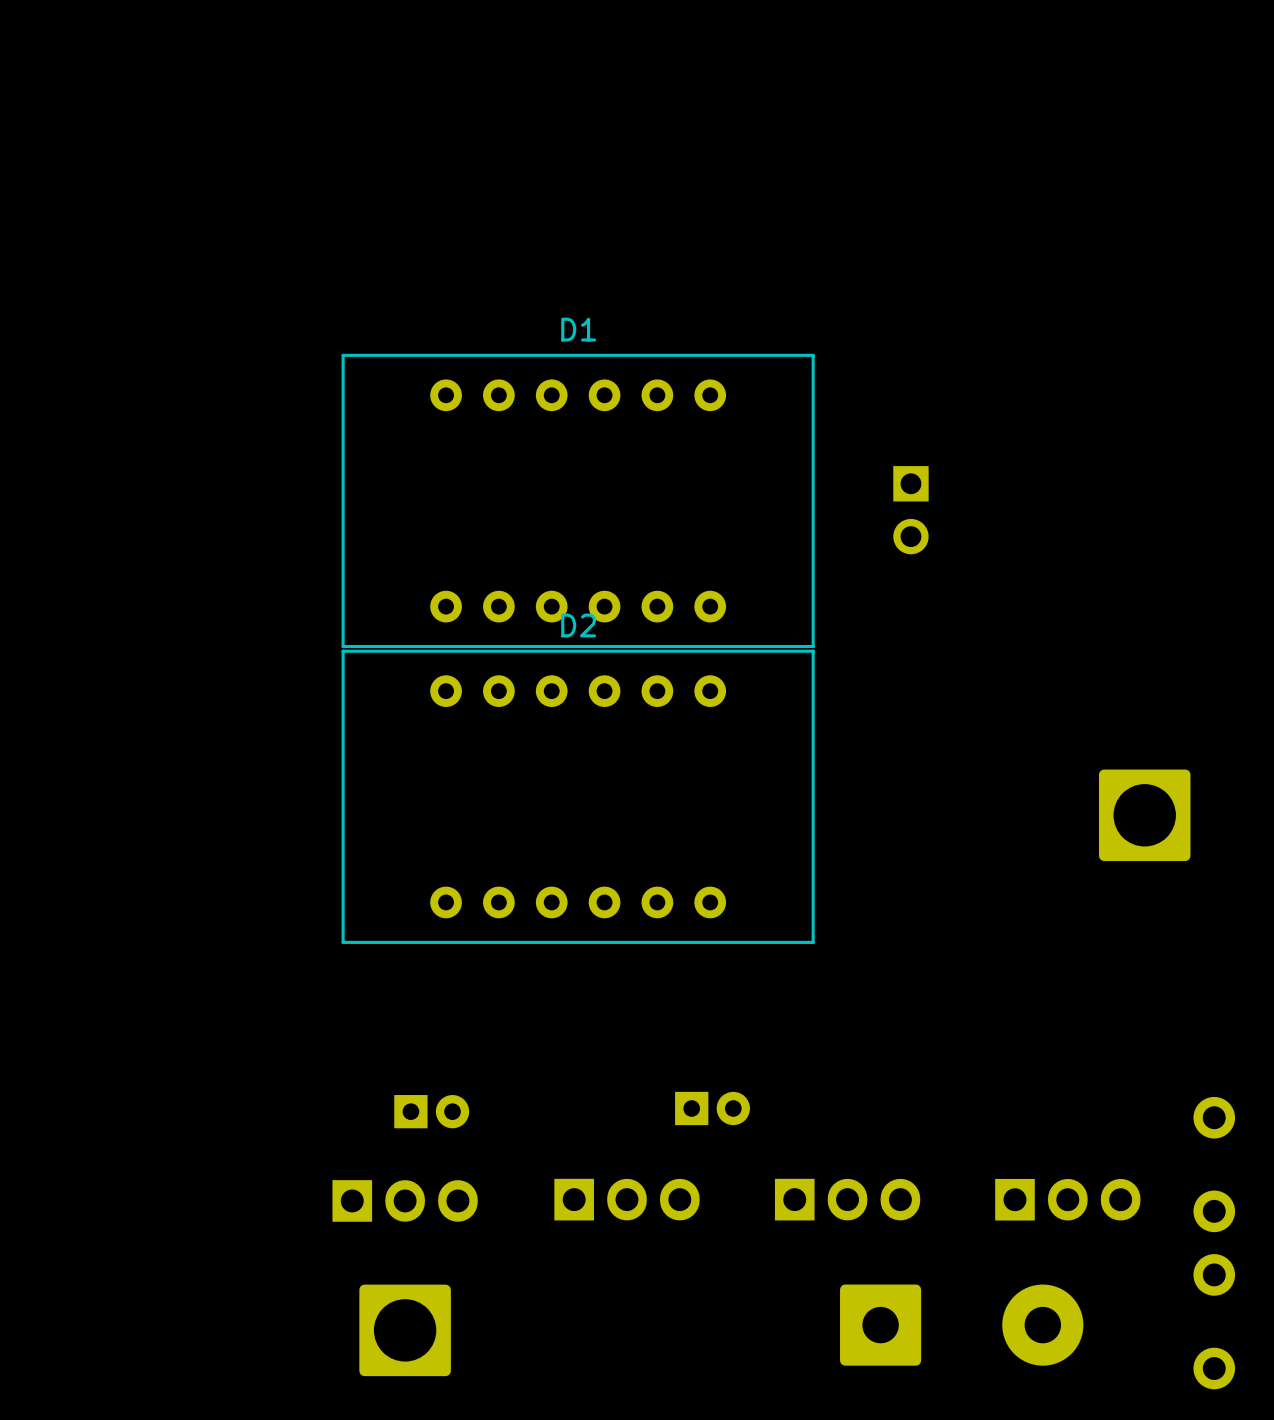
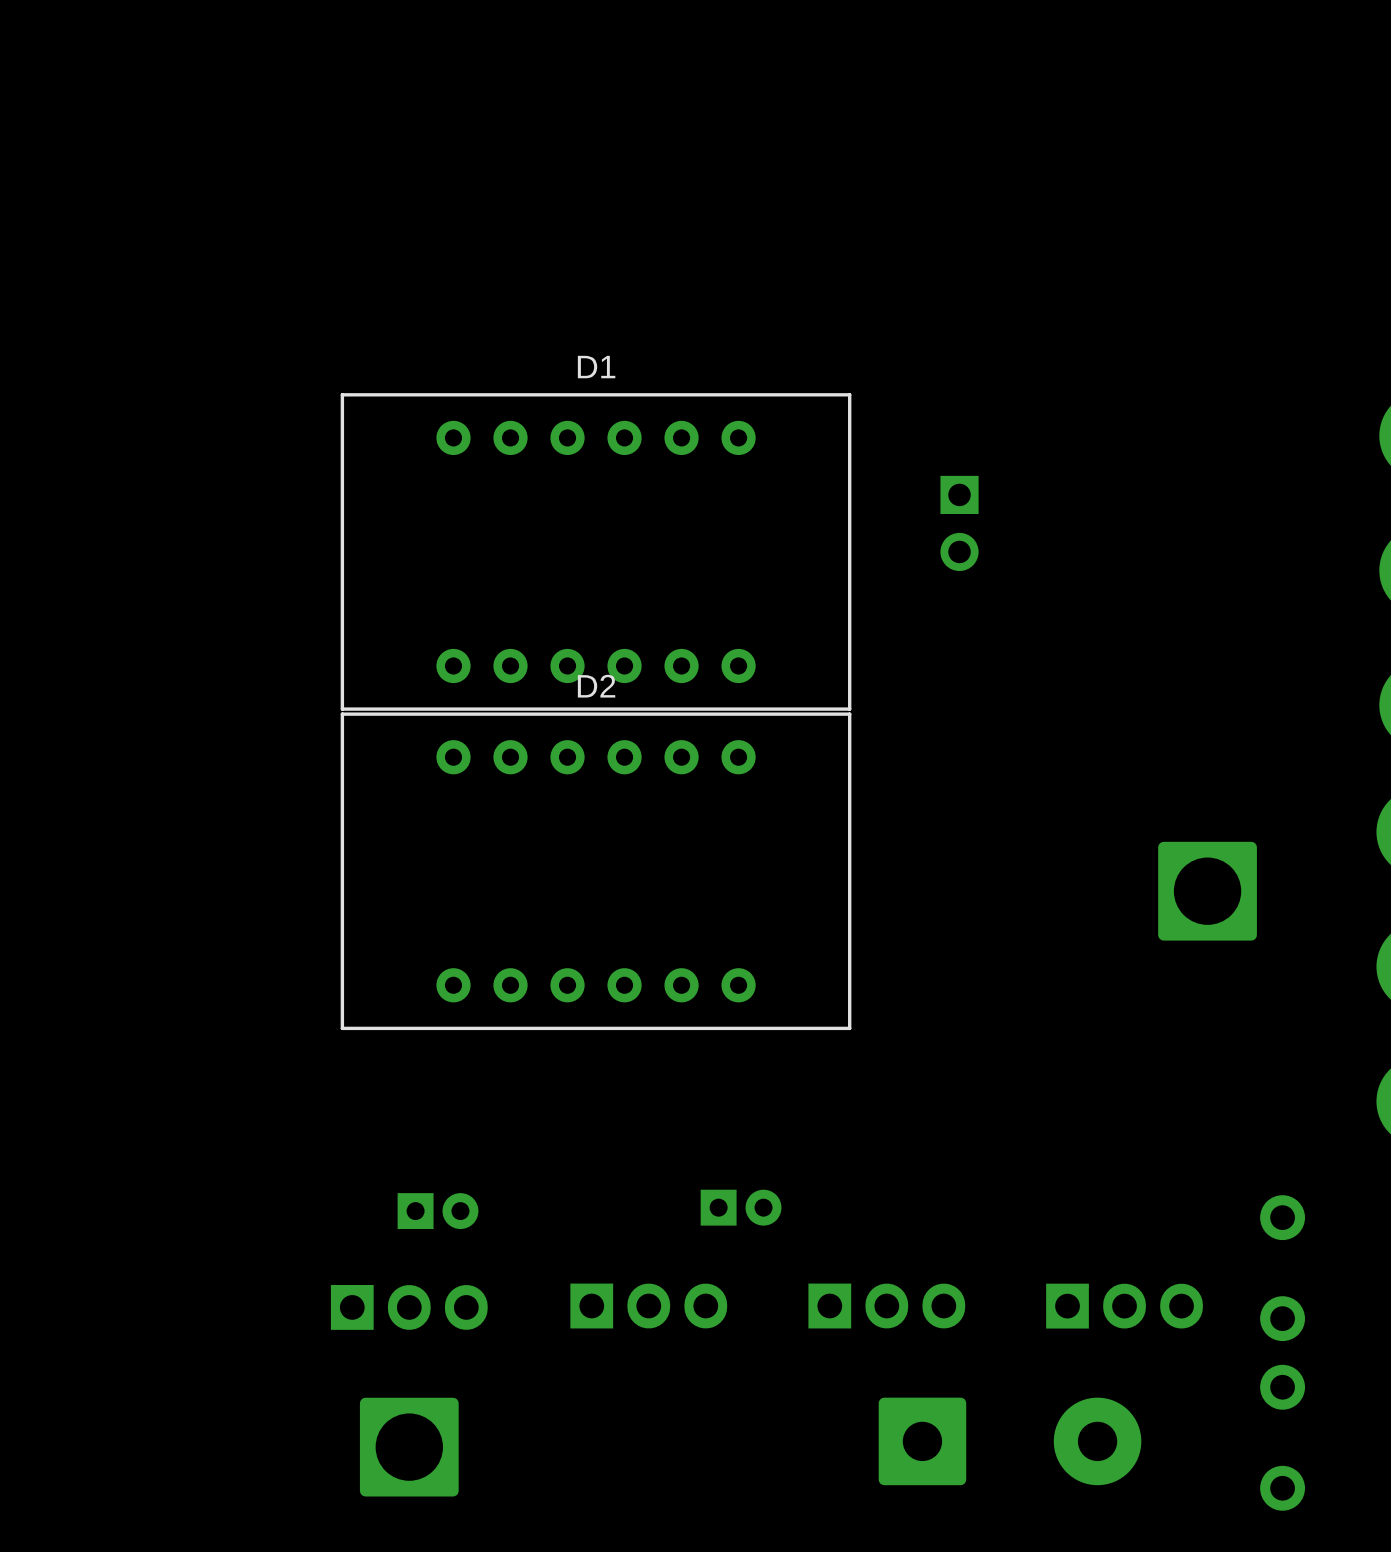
part position: (910, 510) -> (959, 523)

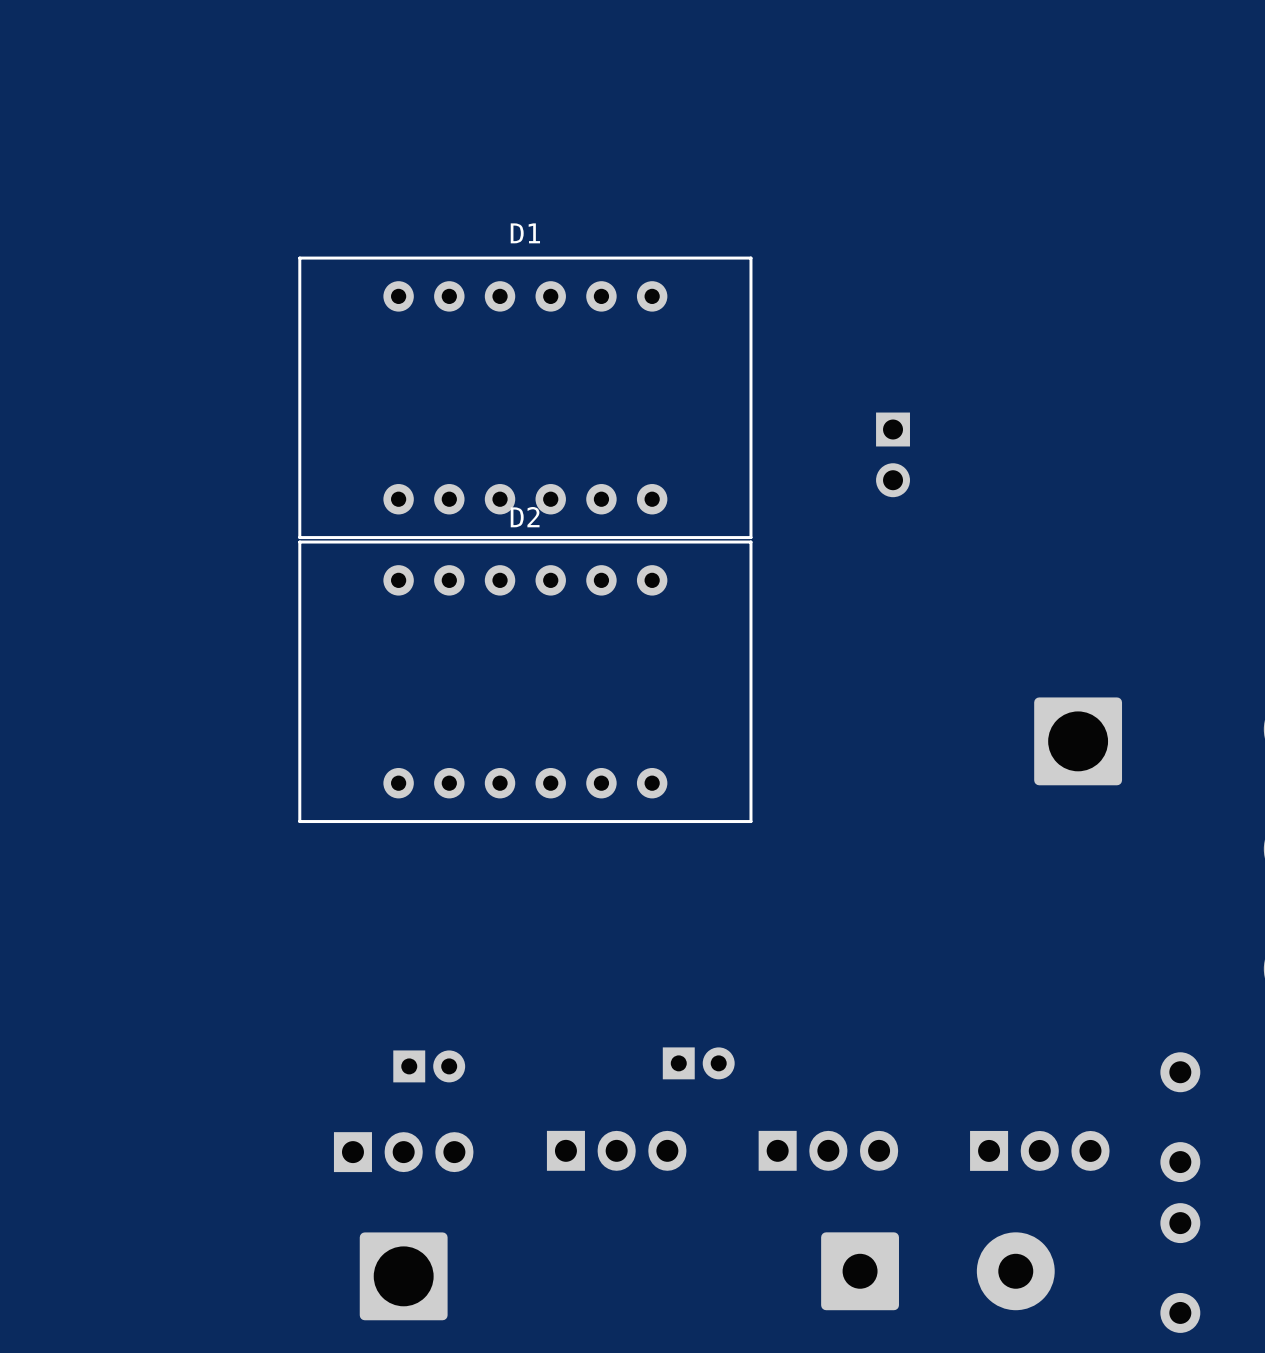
D1 position: (596, 551) -> (525, 397)
D2 position: (596, 871) -> (525, 681)
part position: (1207, 891) -> (1078, 741)

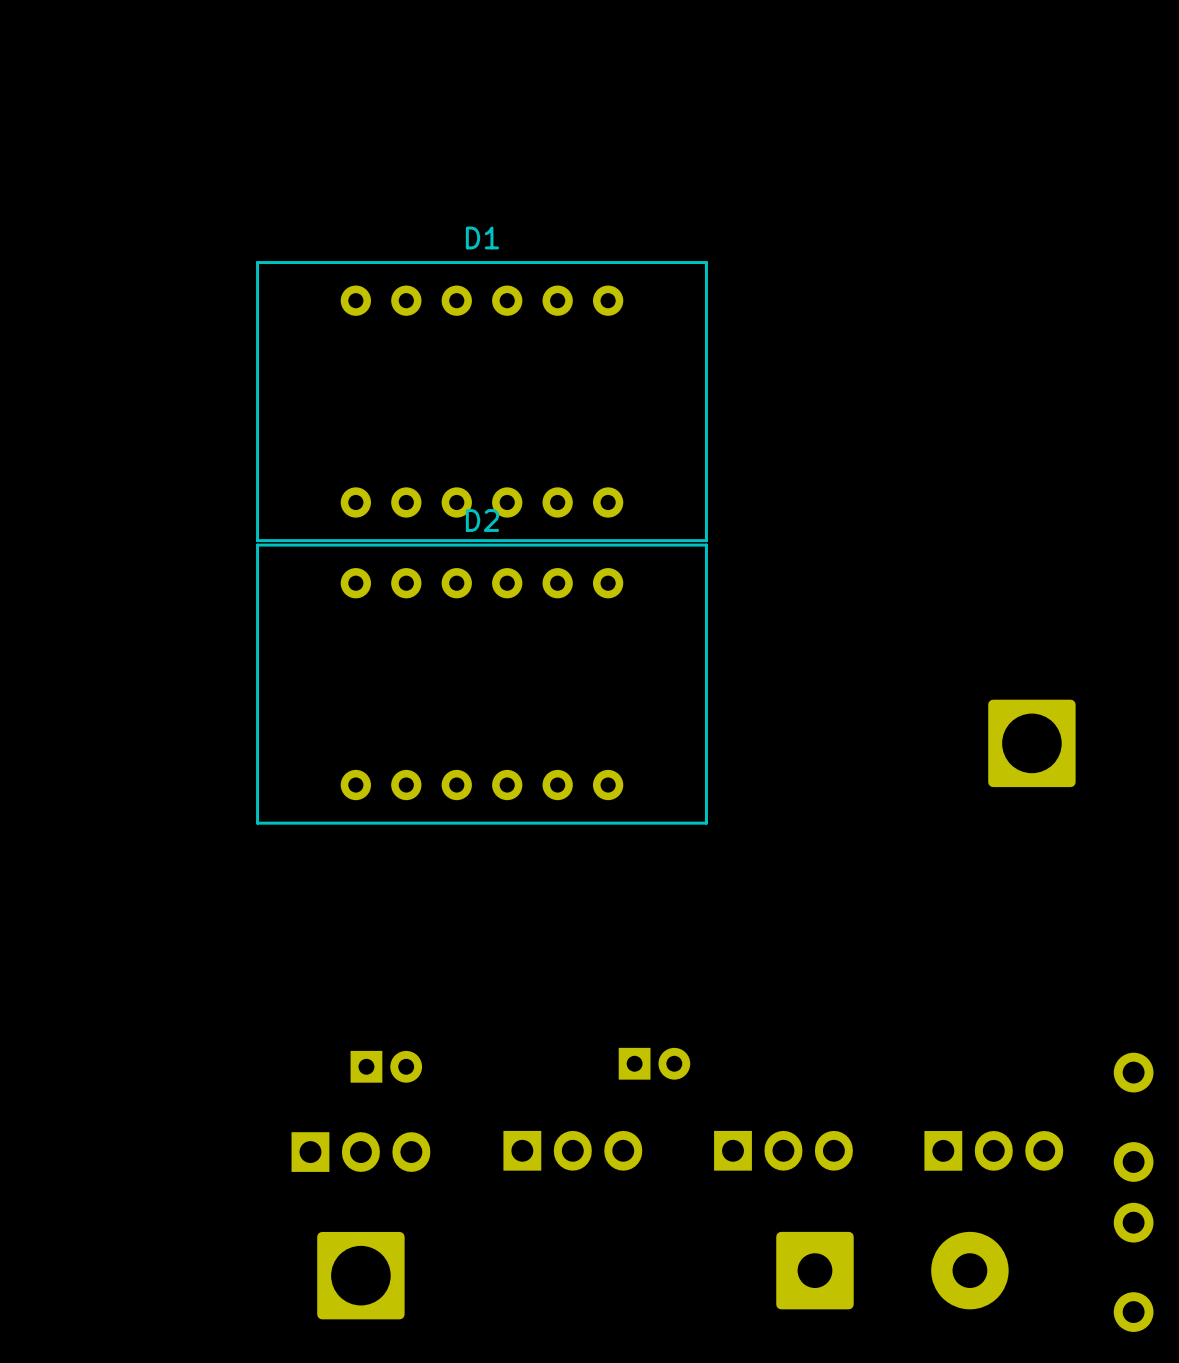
part: (893, 454) -> none

